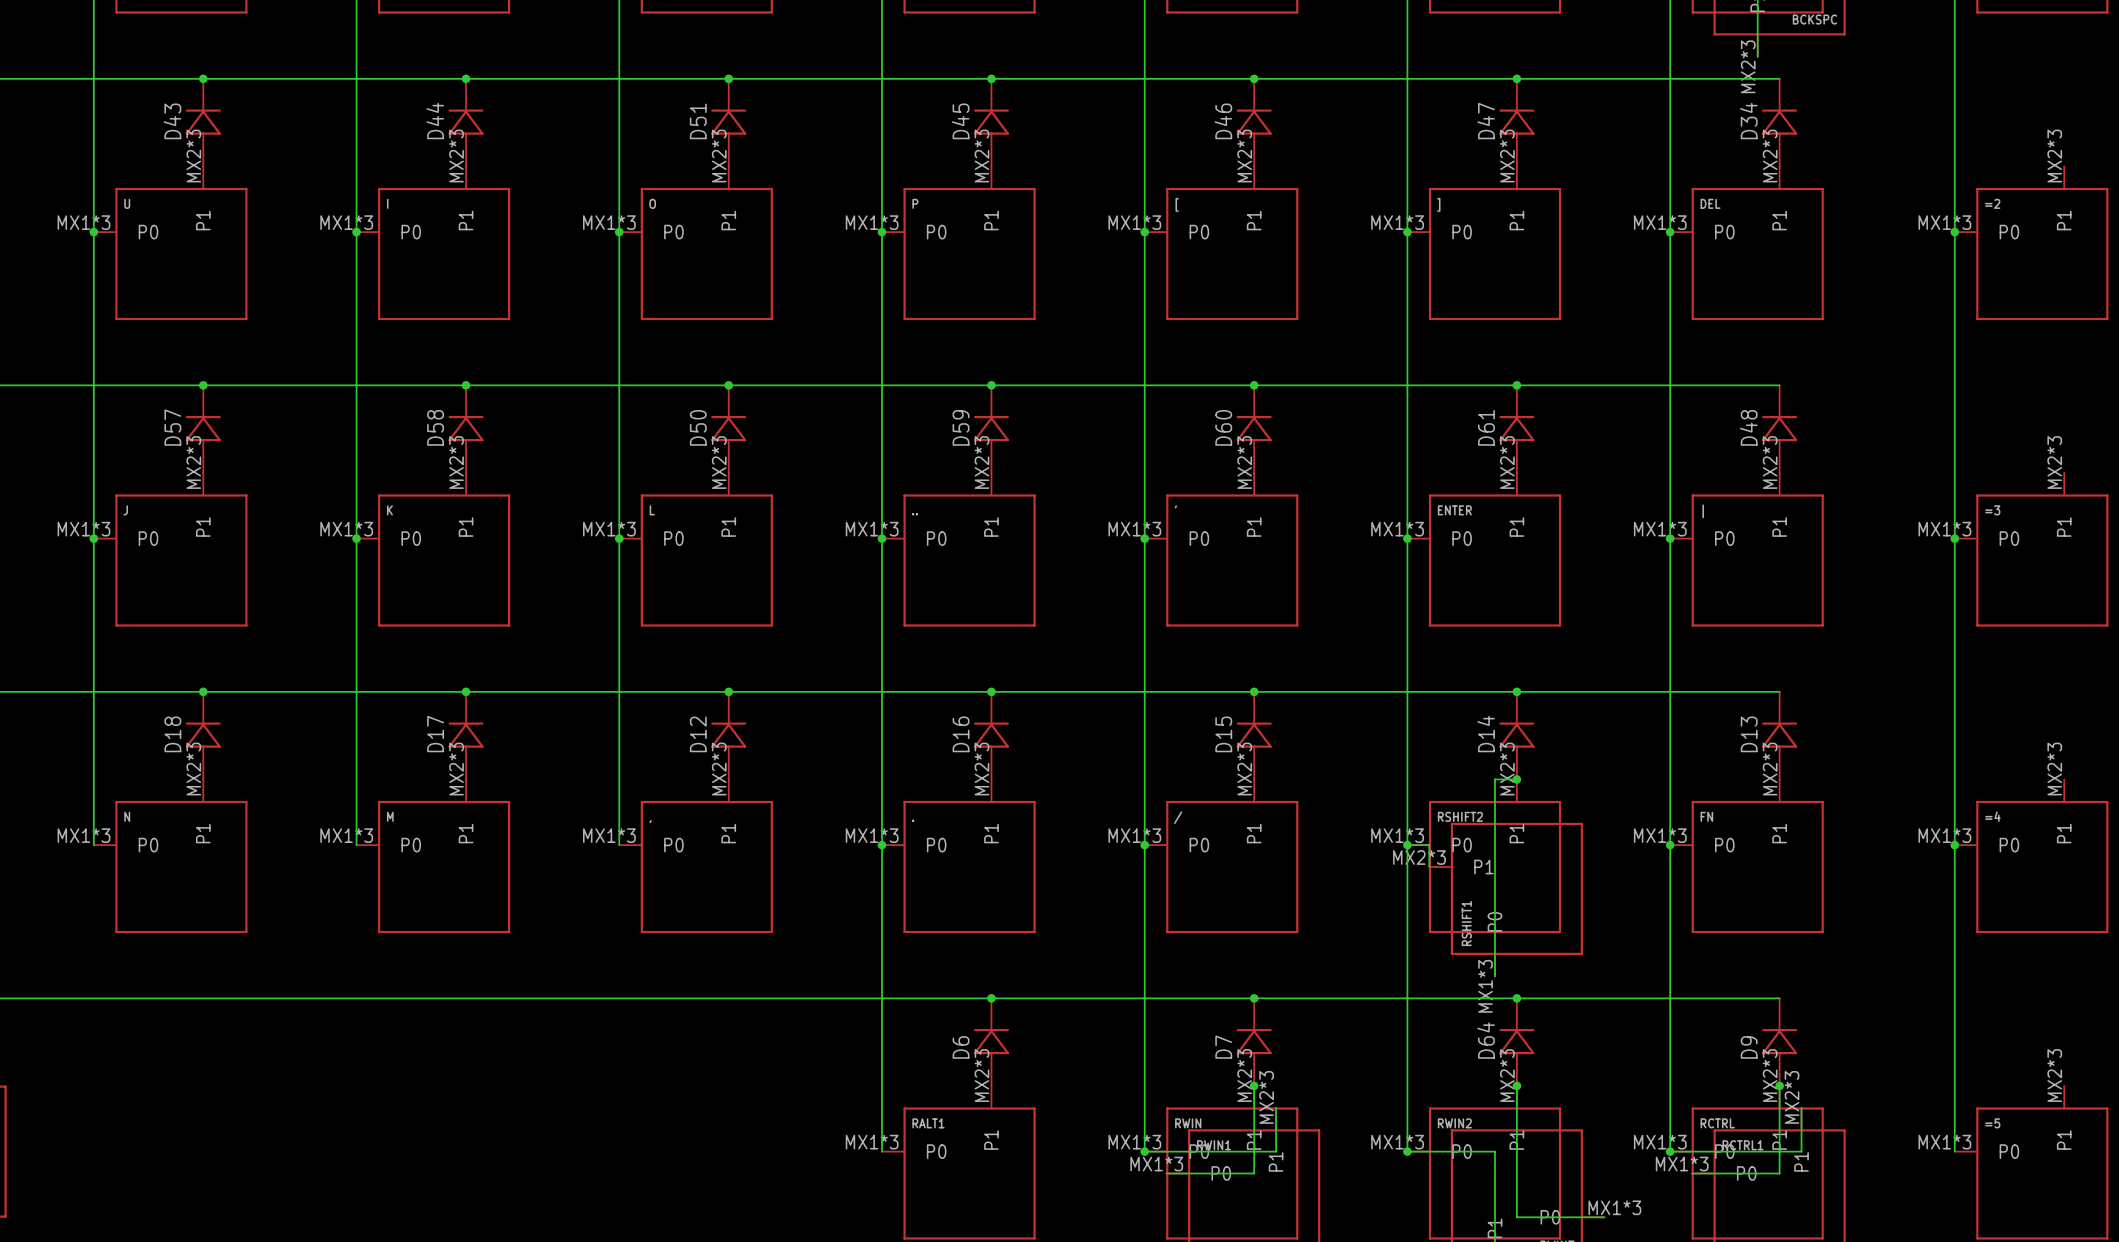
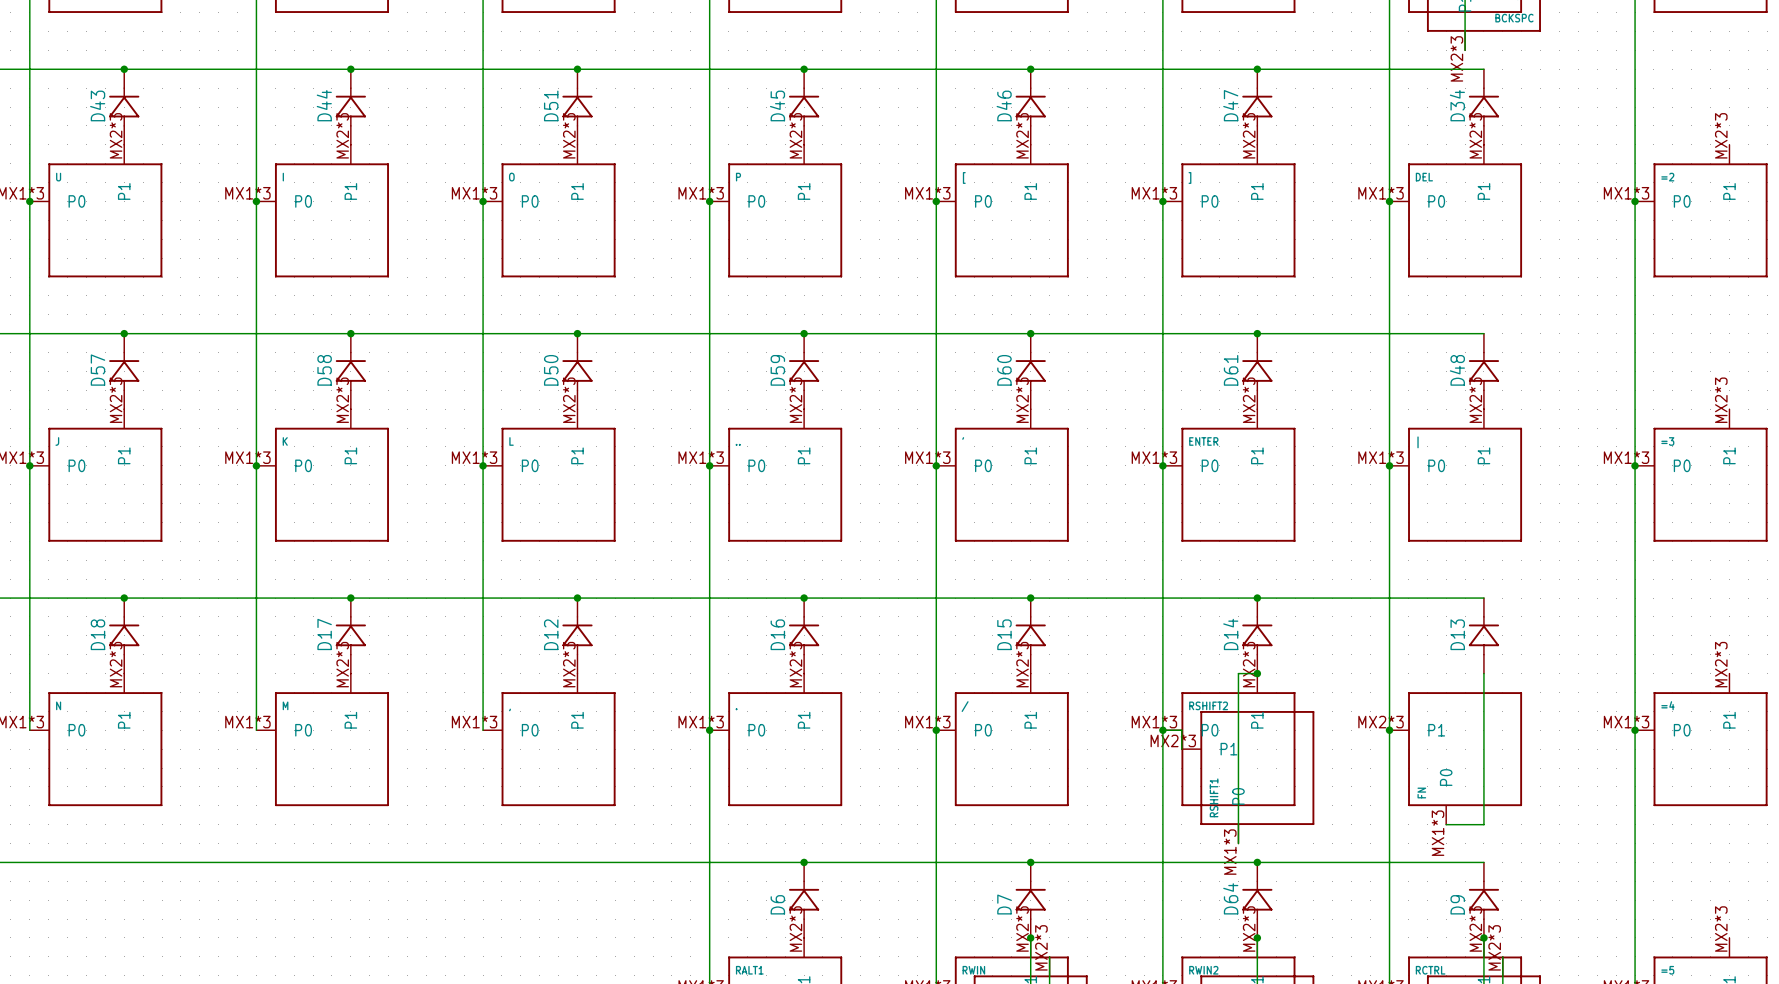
wire: none -> (1483, 673) (1483, 824) (1446, 824)
FN rotation: 0° (1757, 867) -> 90° counterclockwise (1465, 749)

